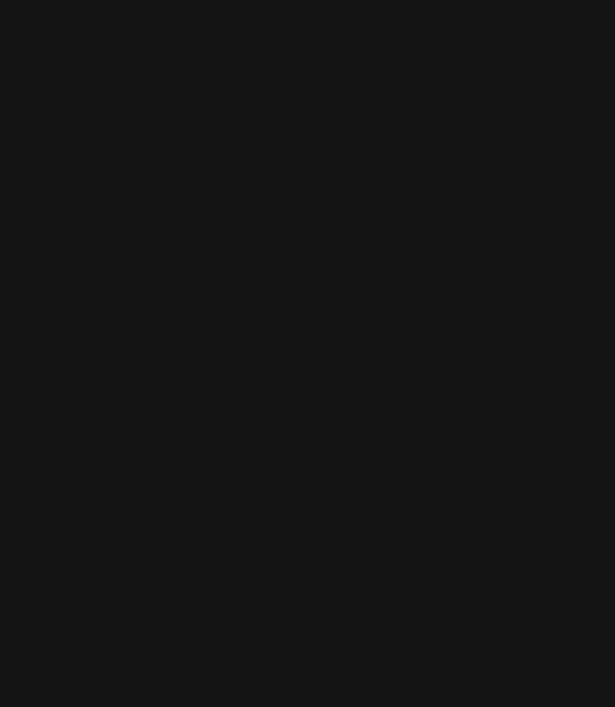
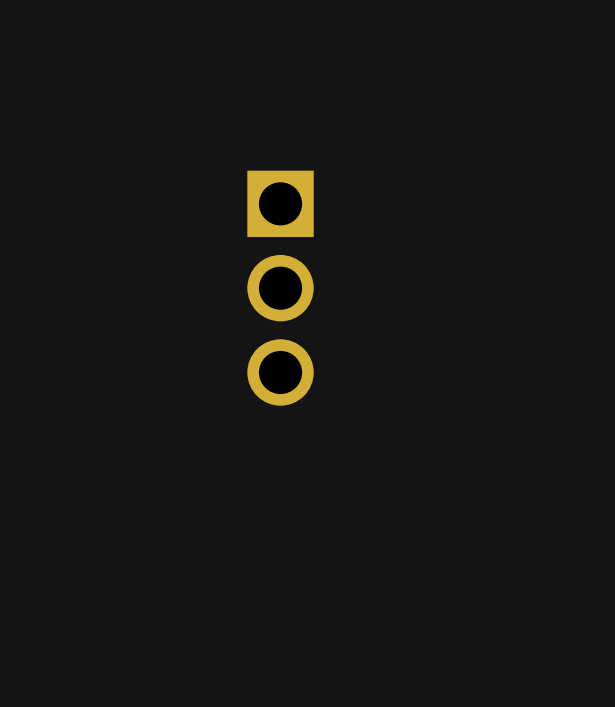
part: none -> (280, 288)

